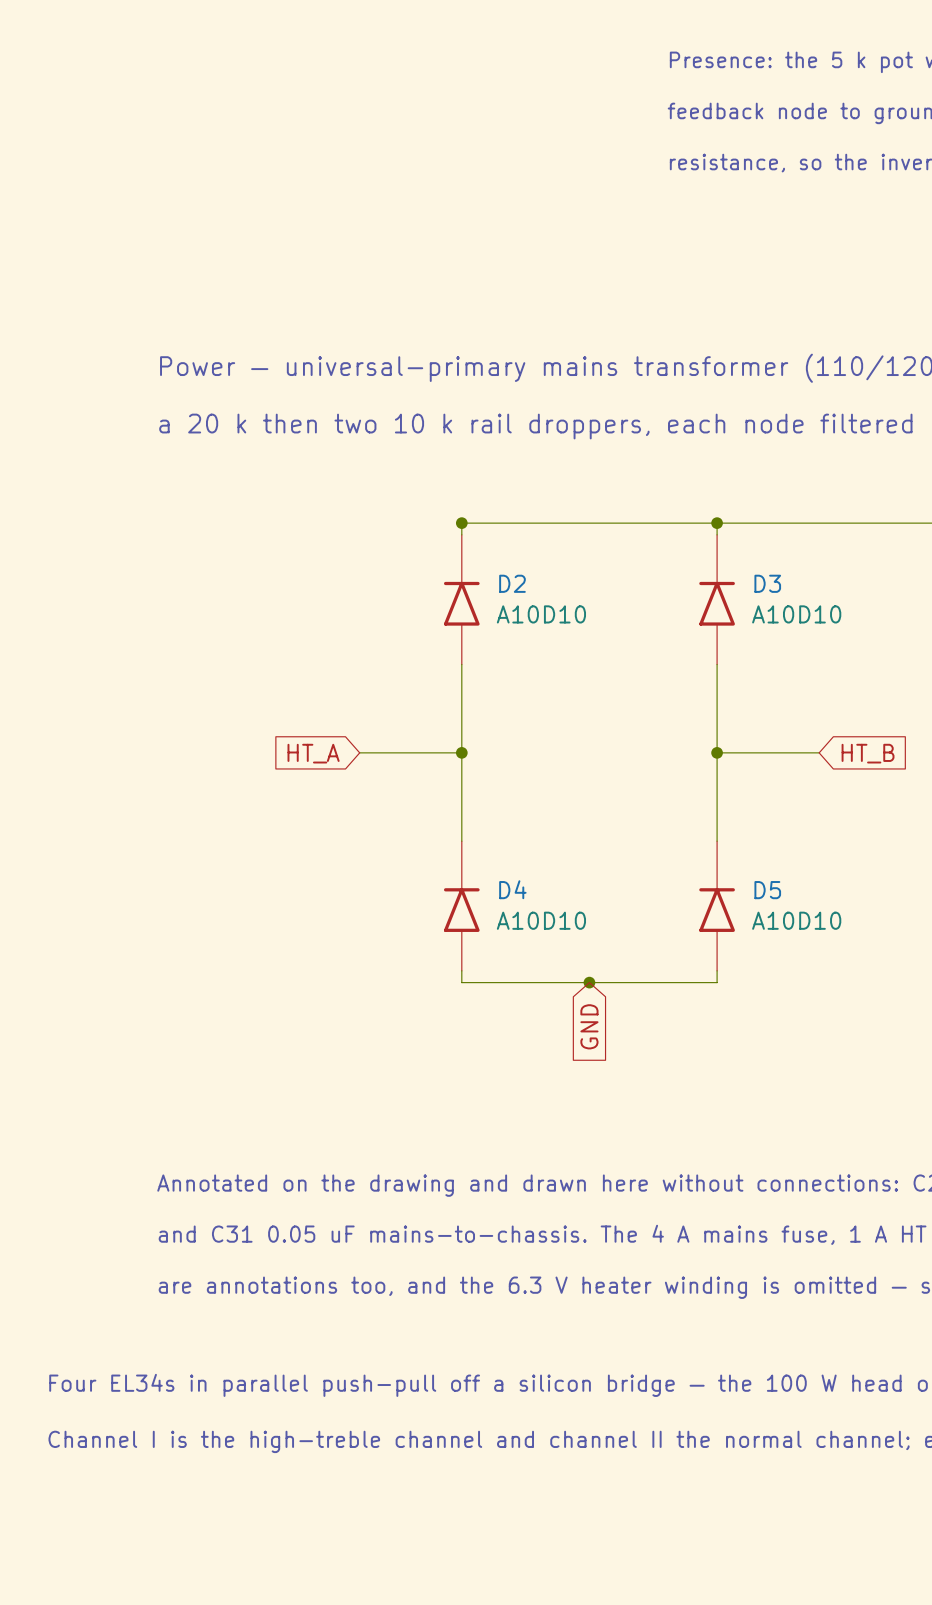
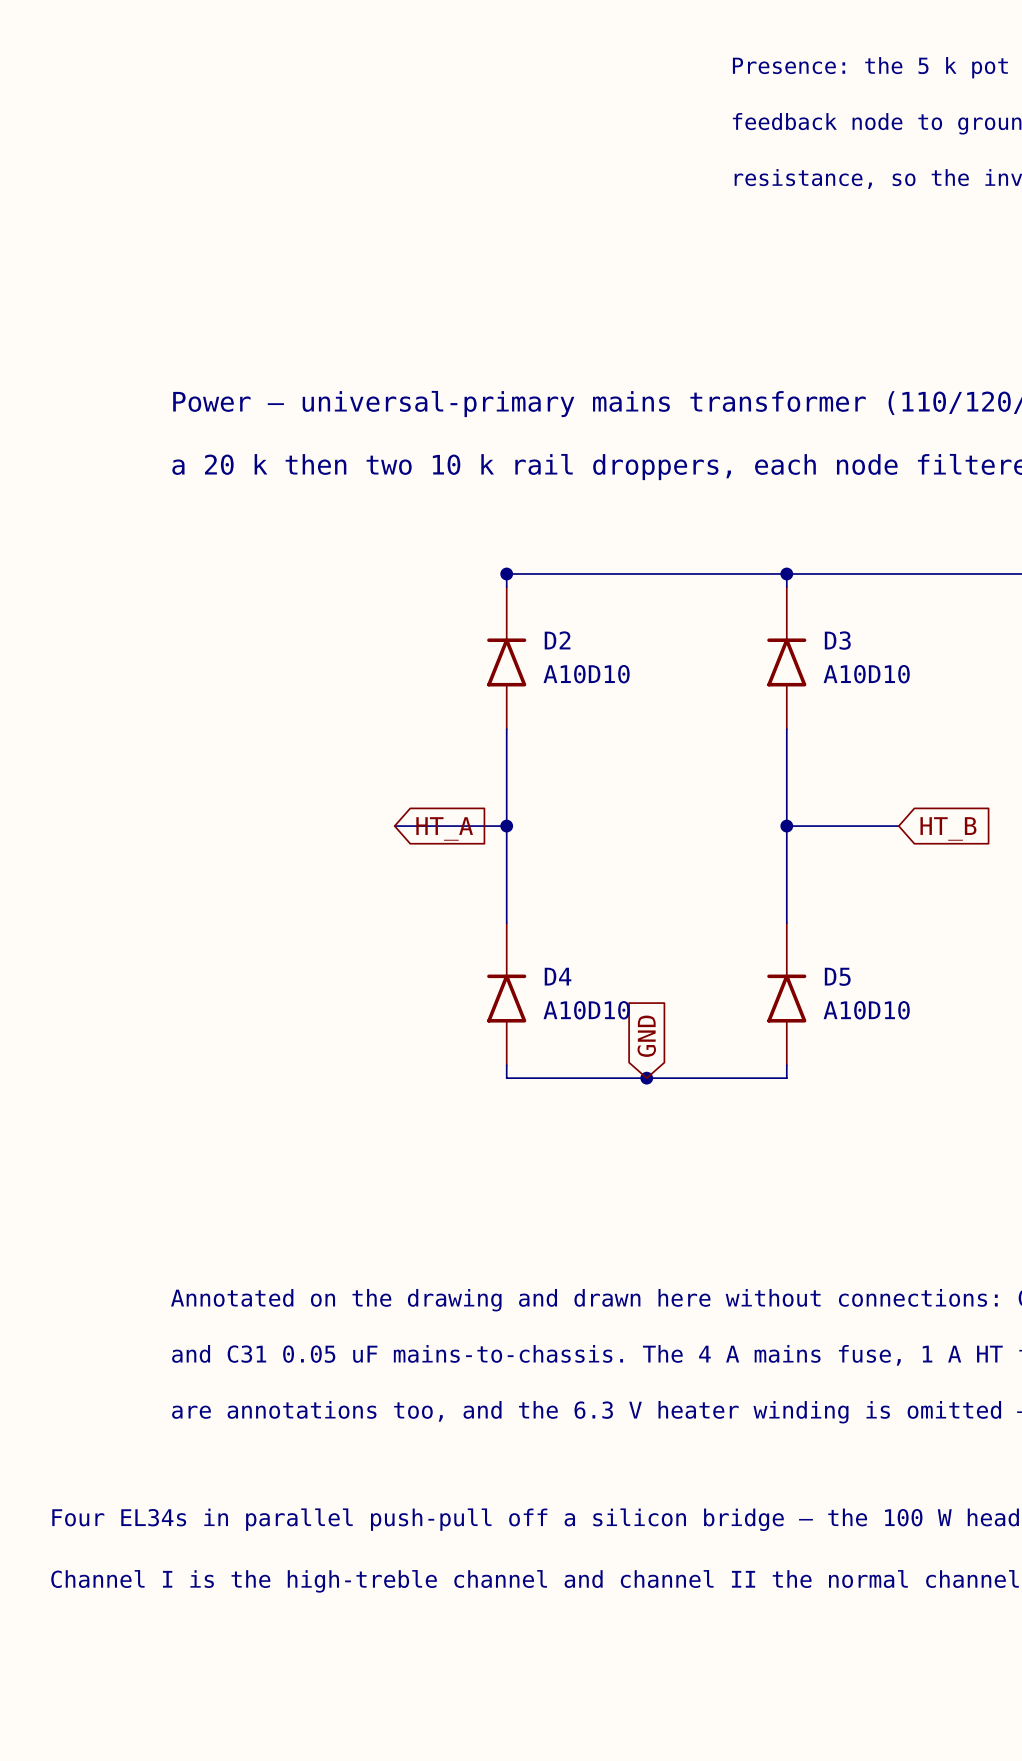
global label rotation: 0° (313, 753) -> 180° (444, 828)
global label rotation: 0° (589, 1026) -> 180° (646, 1036)

